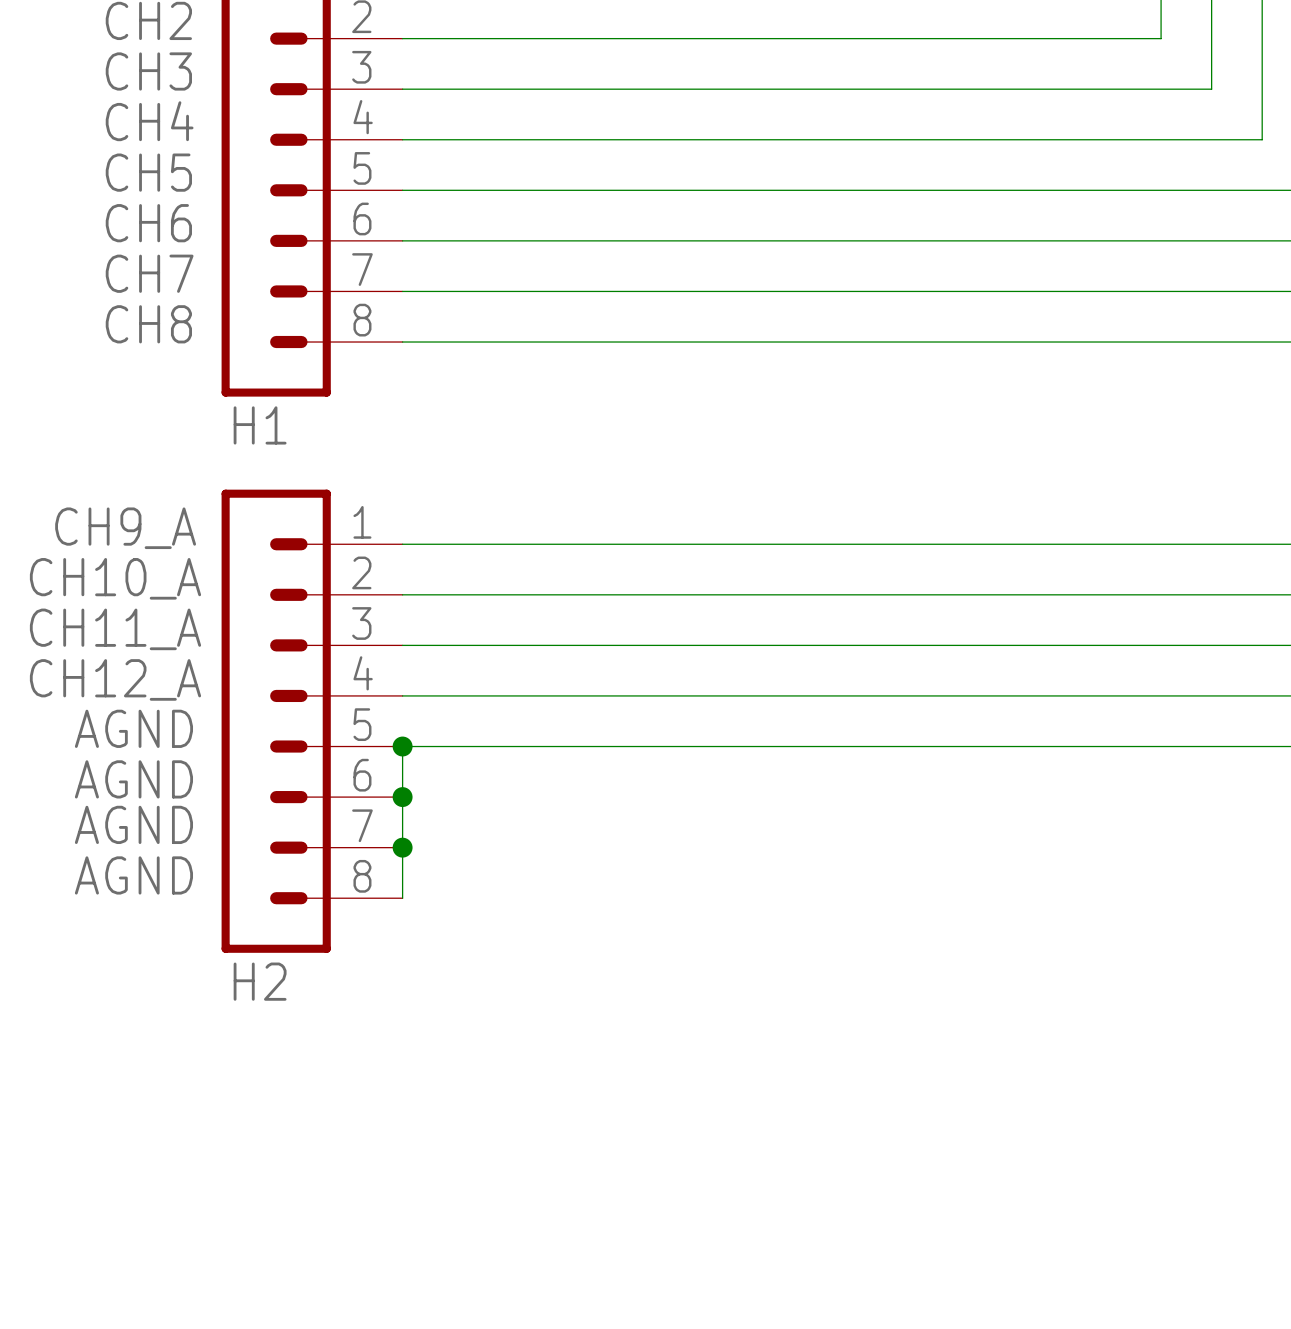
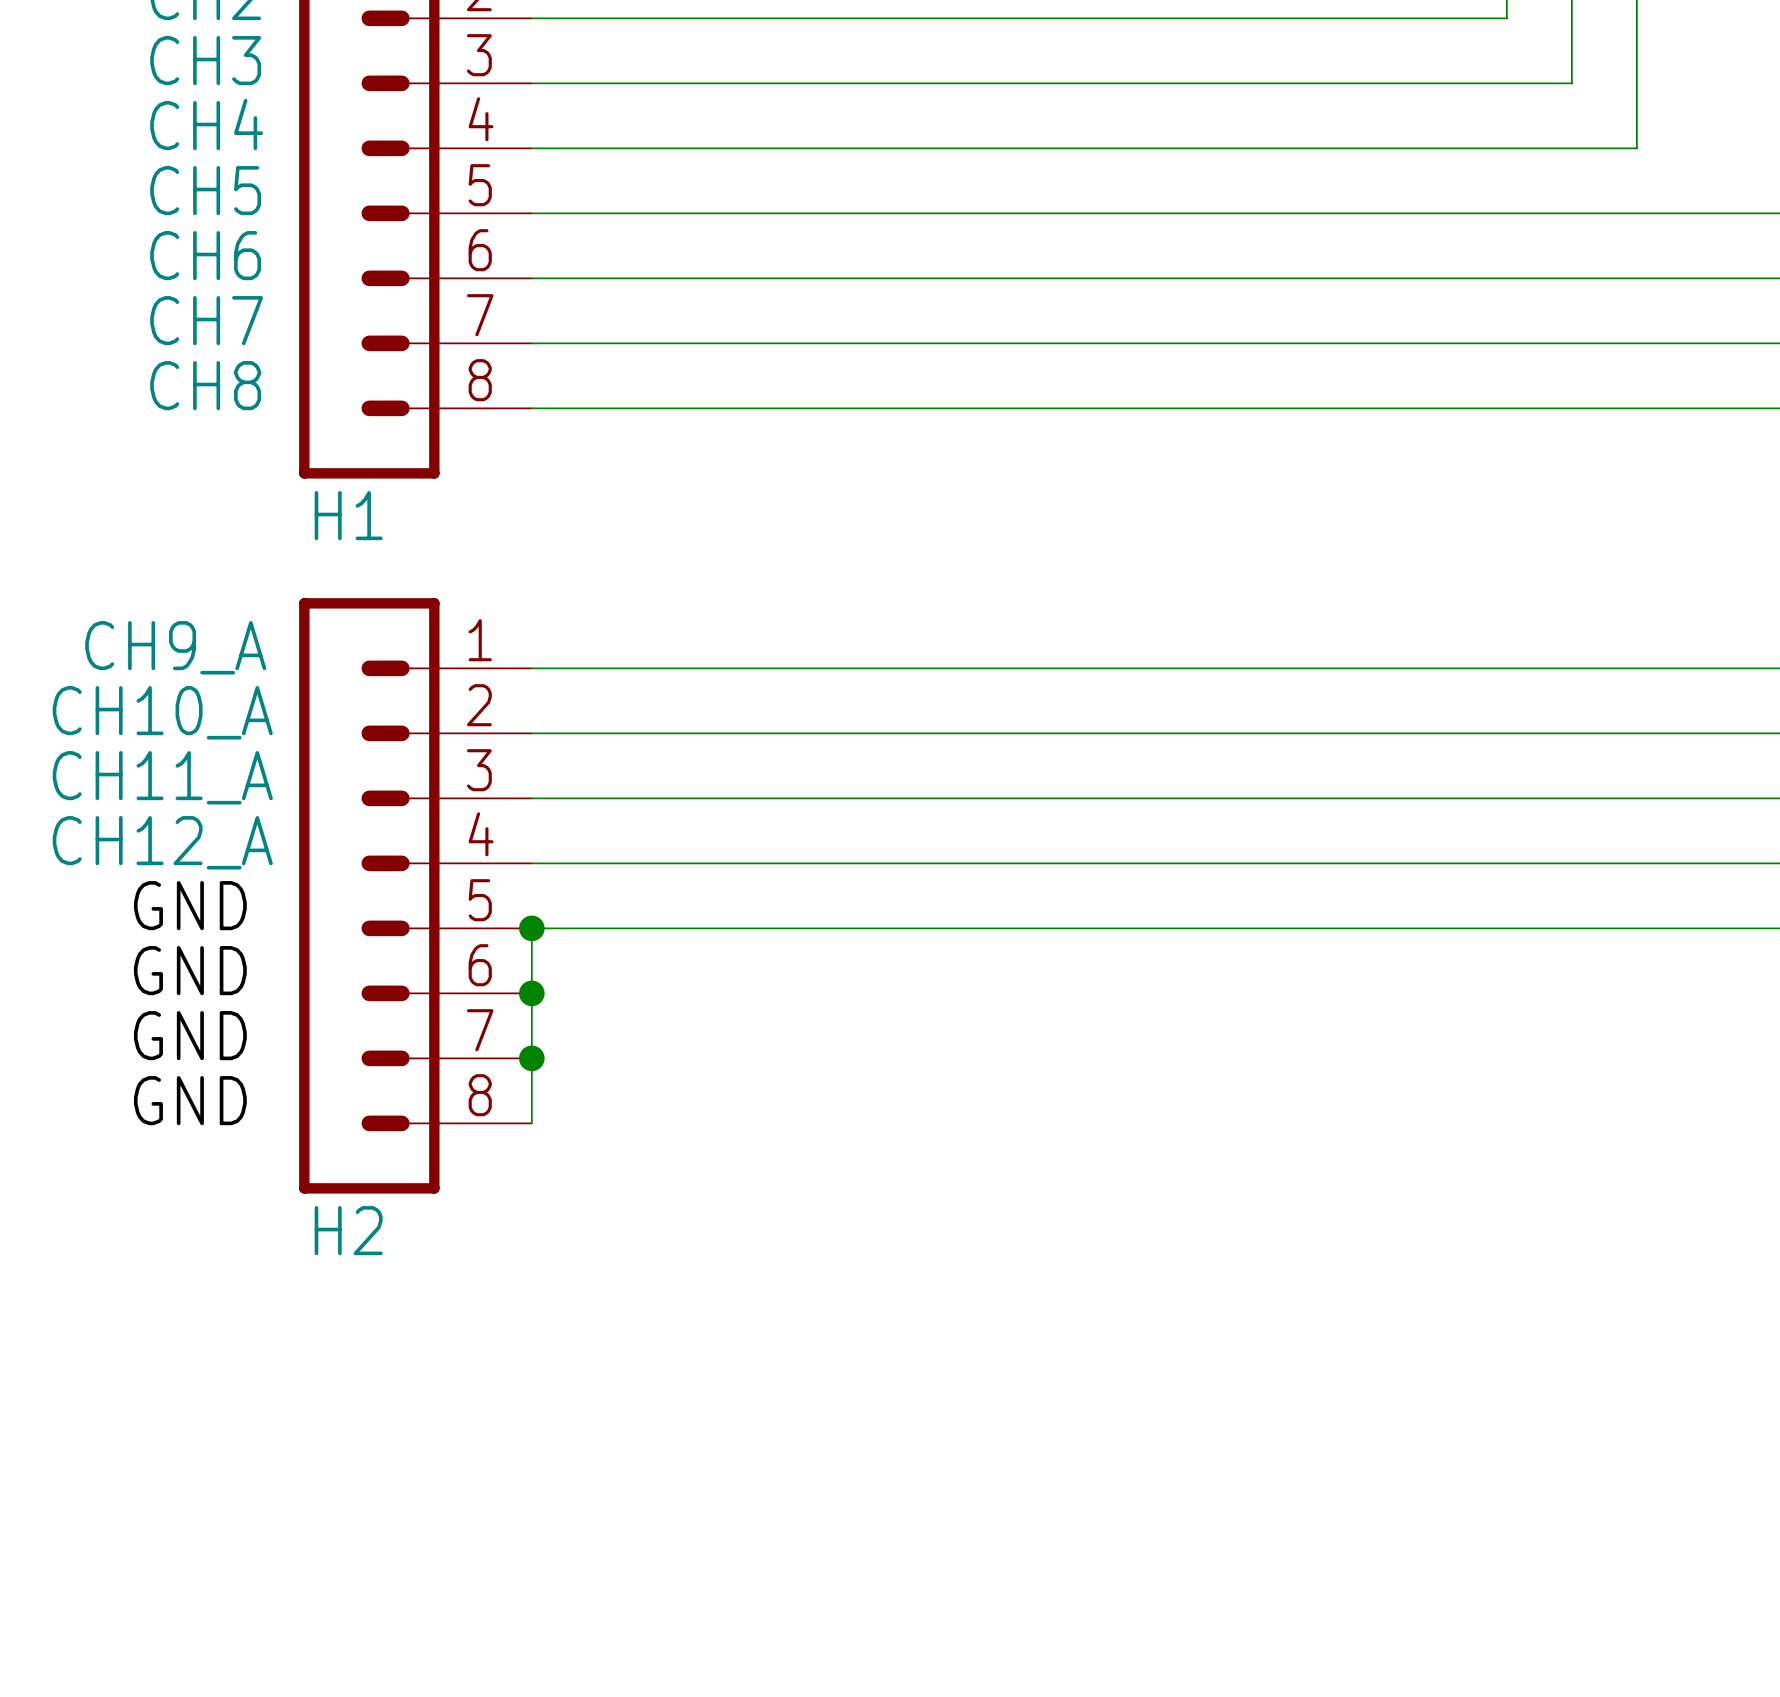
label: AGND (133, 728) -> GND (190, 905)
label: AGND (133, 779) -> GND (190, 970)
label: AGND (133, 824) -> GND (190, 1035)
label: AGND (133, 875) -> GND (190, 1100)

